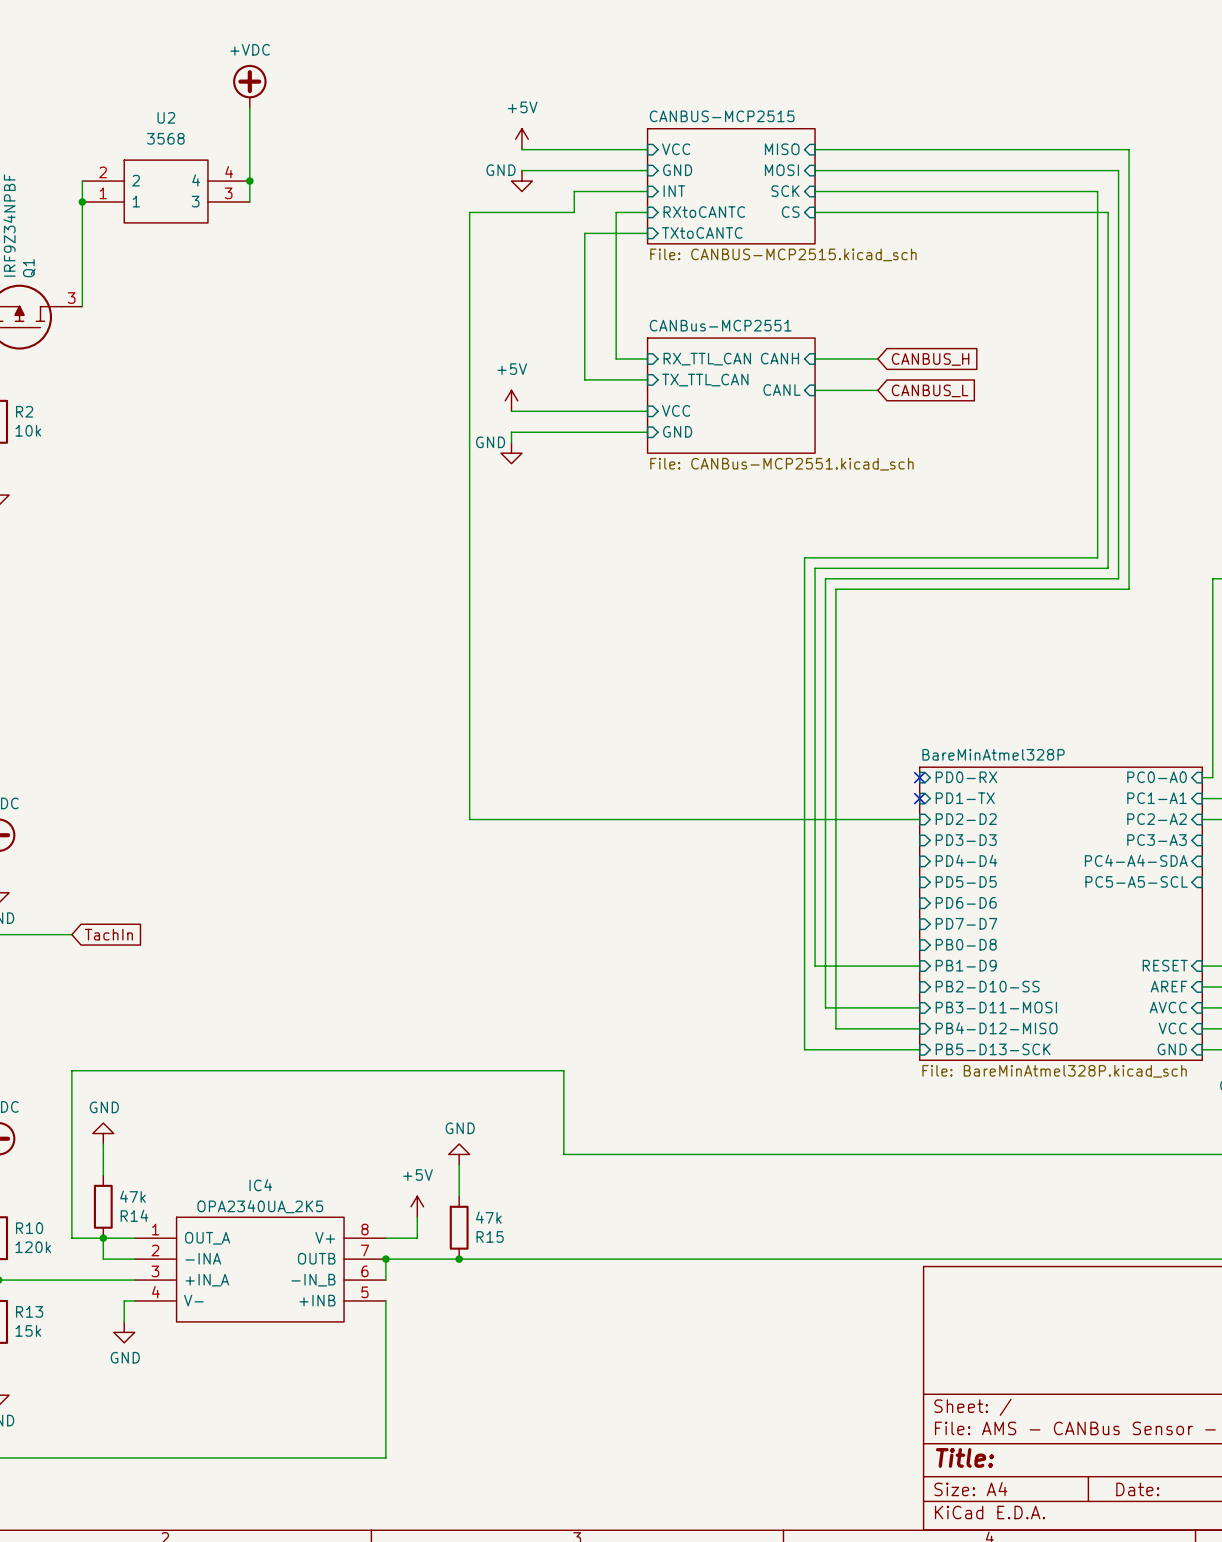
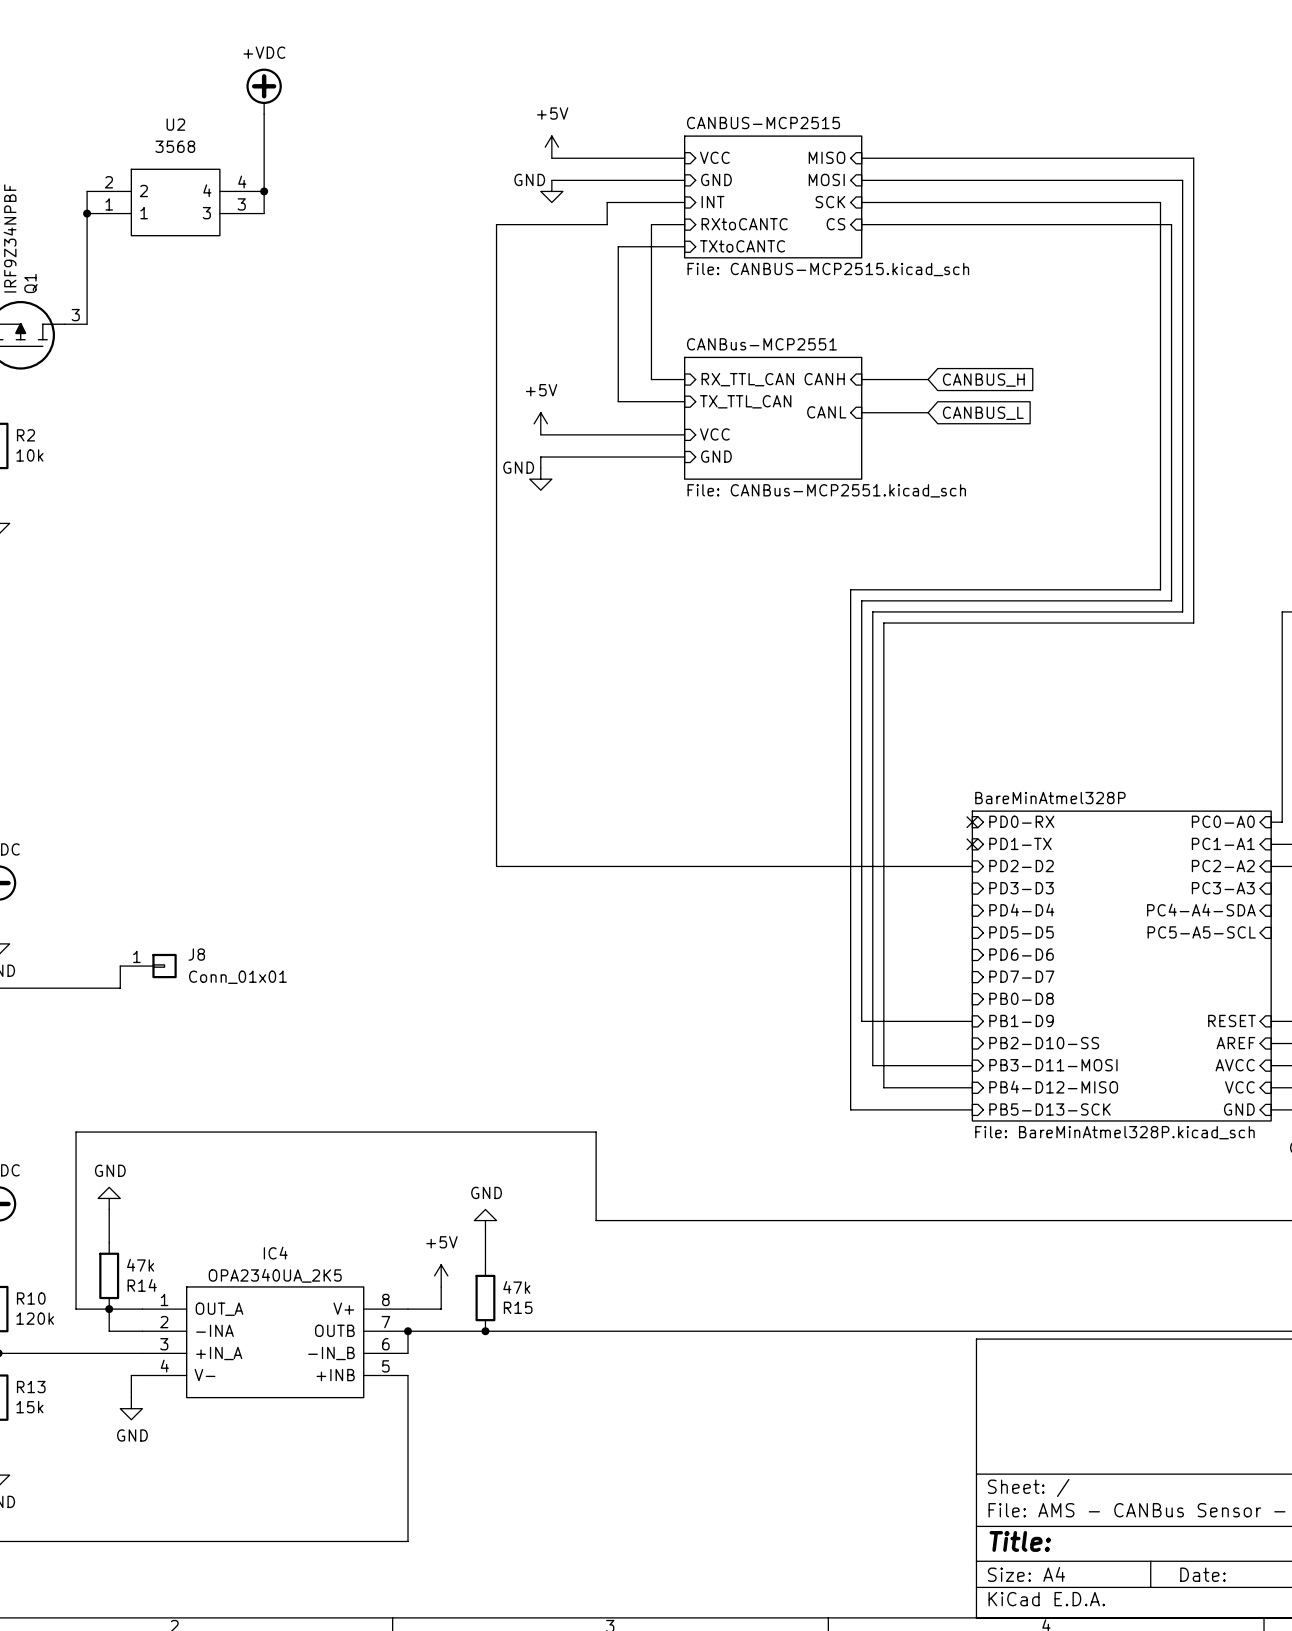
wire: none -> (120, 966) (120, 988) (76, 988)
J8: none -> Conn_01x01 (148, 966)
global label: TachIn (108, 934) -> none

